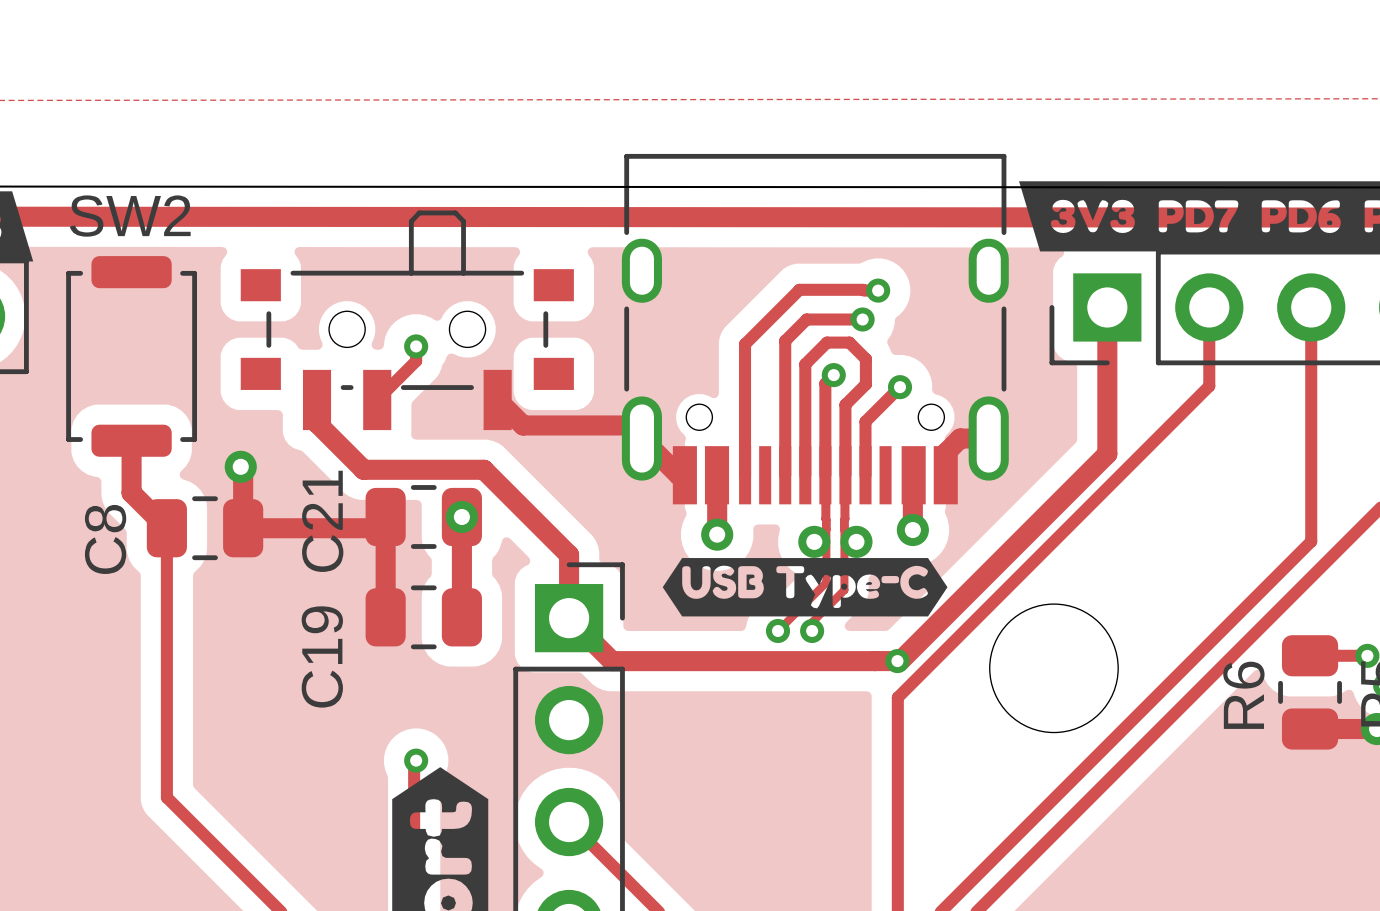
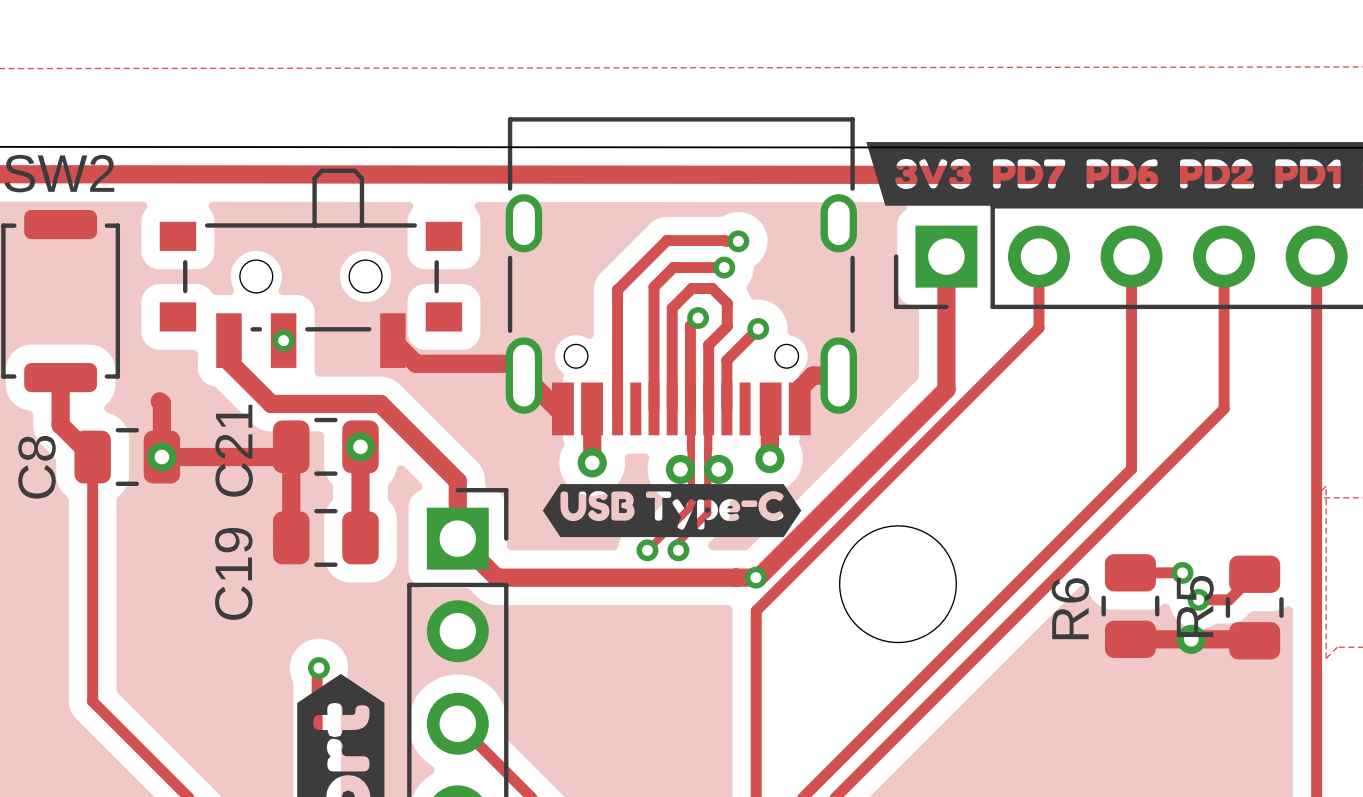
track: (416, 346) (416, 361) (377, 399) -> none
via position: (416, 346) -> (283, 340)
via position: (240, 466) -> (161, 457)

